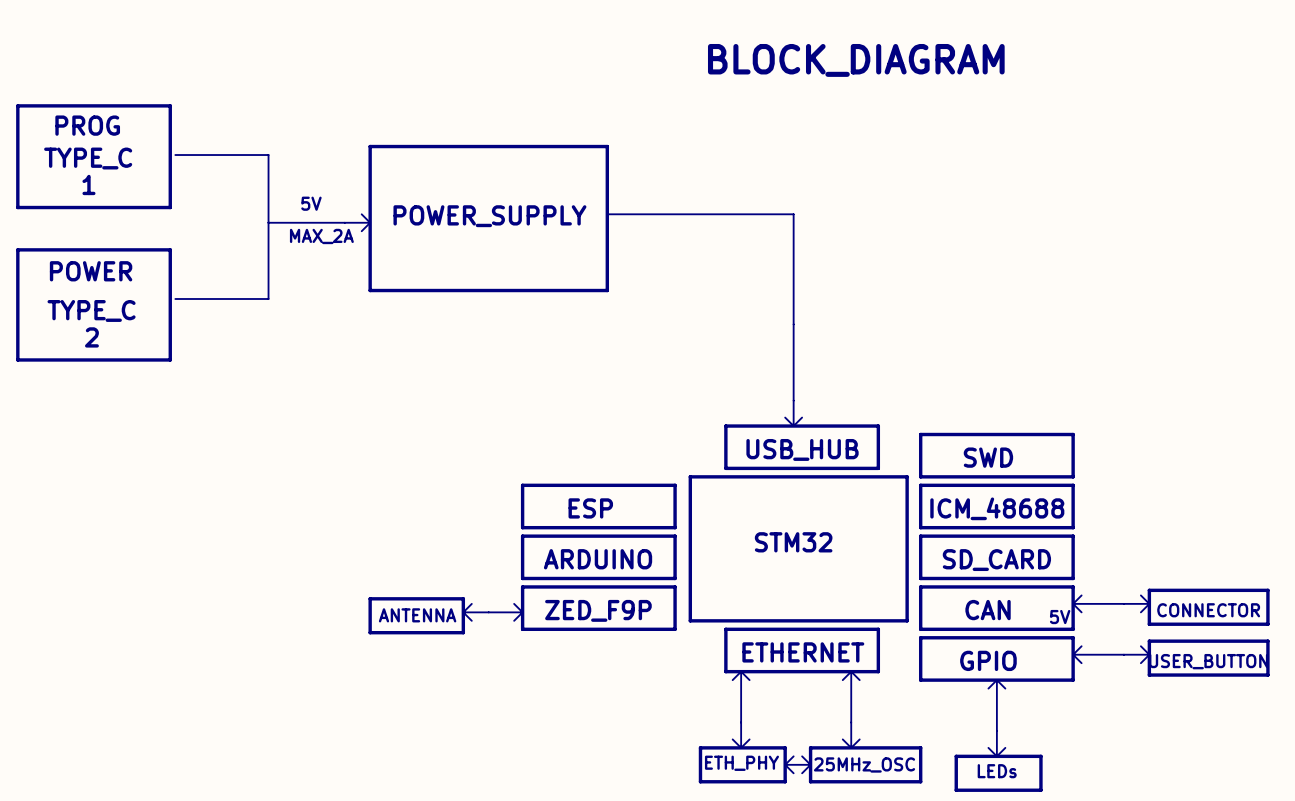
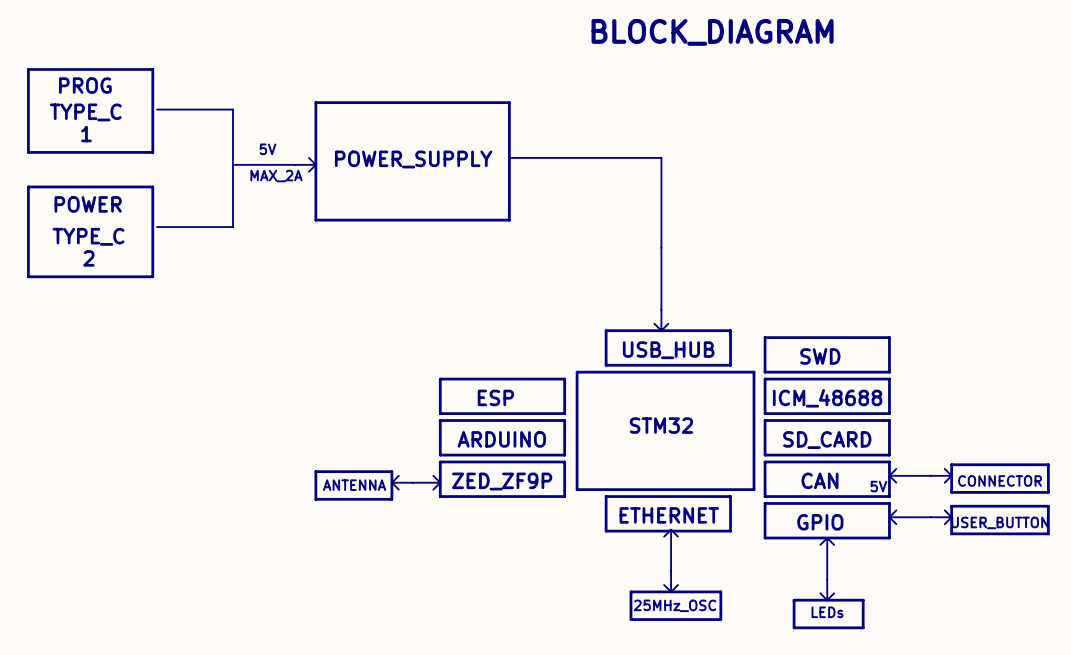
text: ZED_F9P (598, 610) -> ZED_ZF9P (502, 481)
line: (741, 671) (741, 747) -> none
line: (741, 671) (749, 680) -> none
line: (741, 671) (732, 680) -> none
line: (851, 671) (859, 680) -> (671, 529) (677, 536)
line: (851, 671) (851, 747) -> (671, 529) (671, 591)
line: (851, 671) (842, 680) -> (671, 529) (664, 536)
line: (732, 739) (741, 747) -> none
line: (749, 739) (741, 747) -> none
line: (842, 739) (851, 747) -> (664, 585) (671, 591)
line: (859, 739) (851, 747) -> (677, 585) (671, 591)
line: (700, 747) (785, 747) (785, 781) (700, 781) (700, 747) -> none
line: (810, 747) (920, 747) (920, 781) (810, 781) (810, 747) -> (630, 591) (720, 591) (720, 619) (630, 619) (630, 591)
line: (793, 756) (785, 764) -> none
line: (802, 756) (810, 764) -> none
text: ETH_PHY (741, 763) -> none
line: (785, 764) (793, 773) -> none
line: (785, 764) (810, 764) -> none
line: (810, 764) (802, 773) -> none
text position: 25MHz_OSC (864, 764) -> 25MHz_OSC (674, 605)

